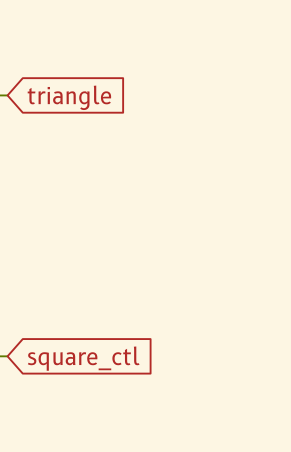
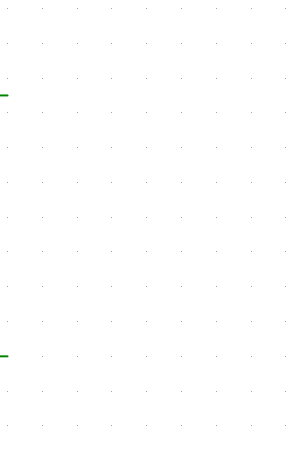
global label: triangle (69, 97) -> none
global label: square_ctl (83, 358) -> none

